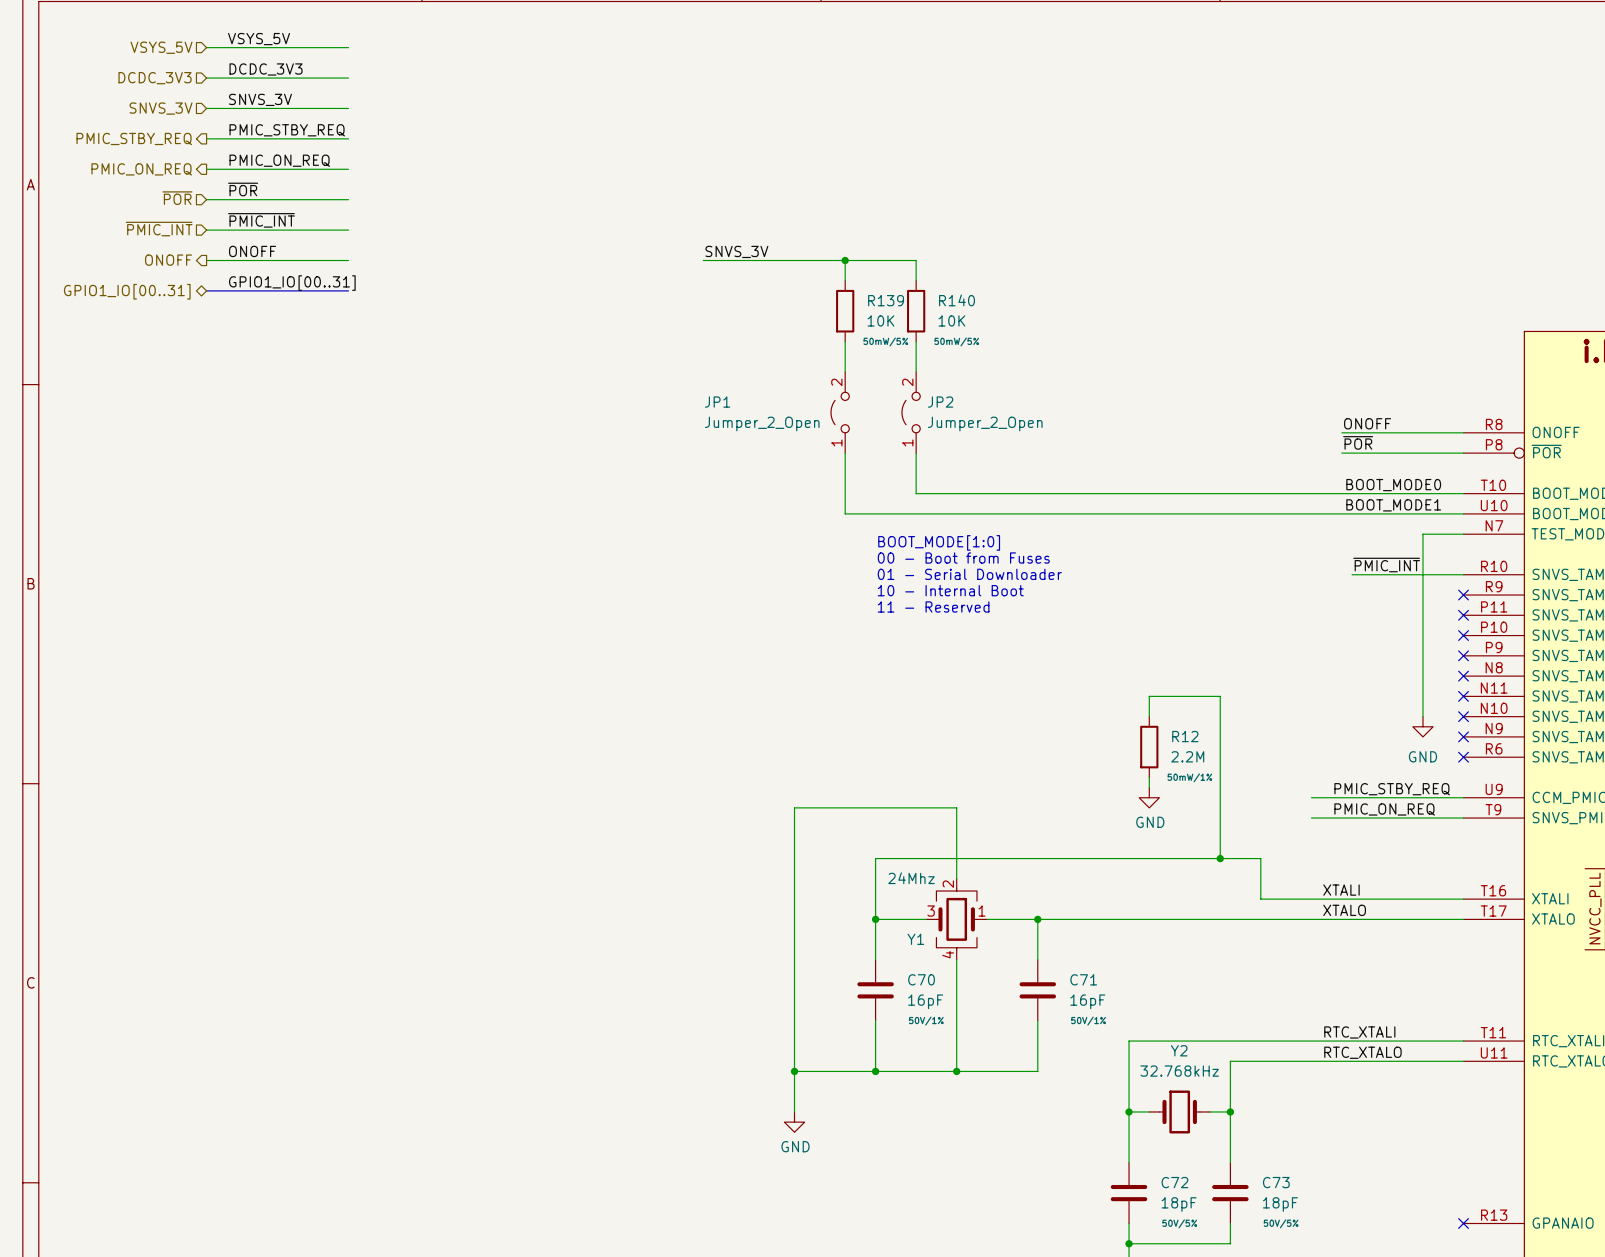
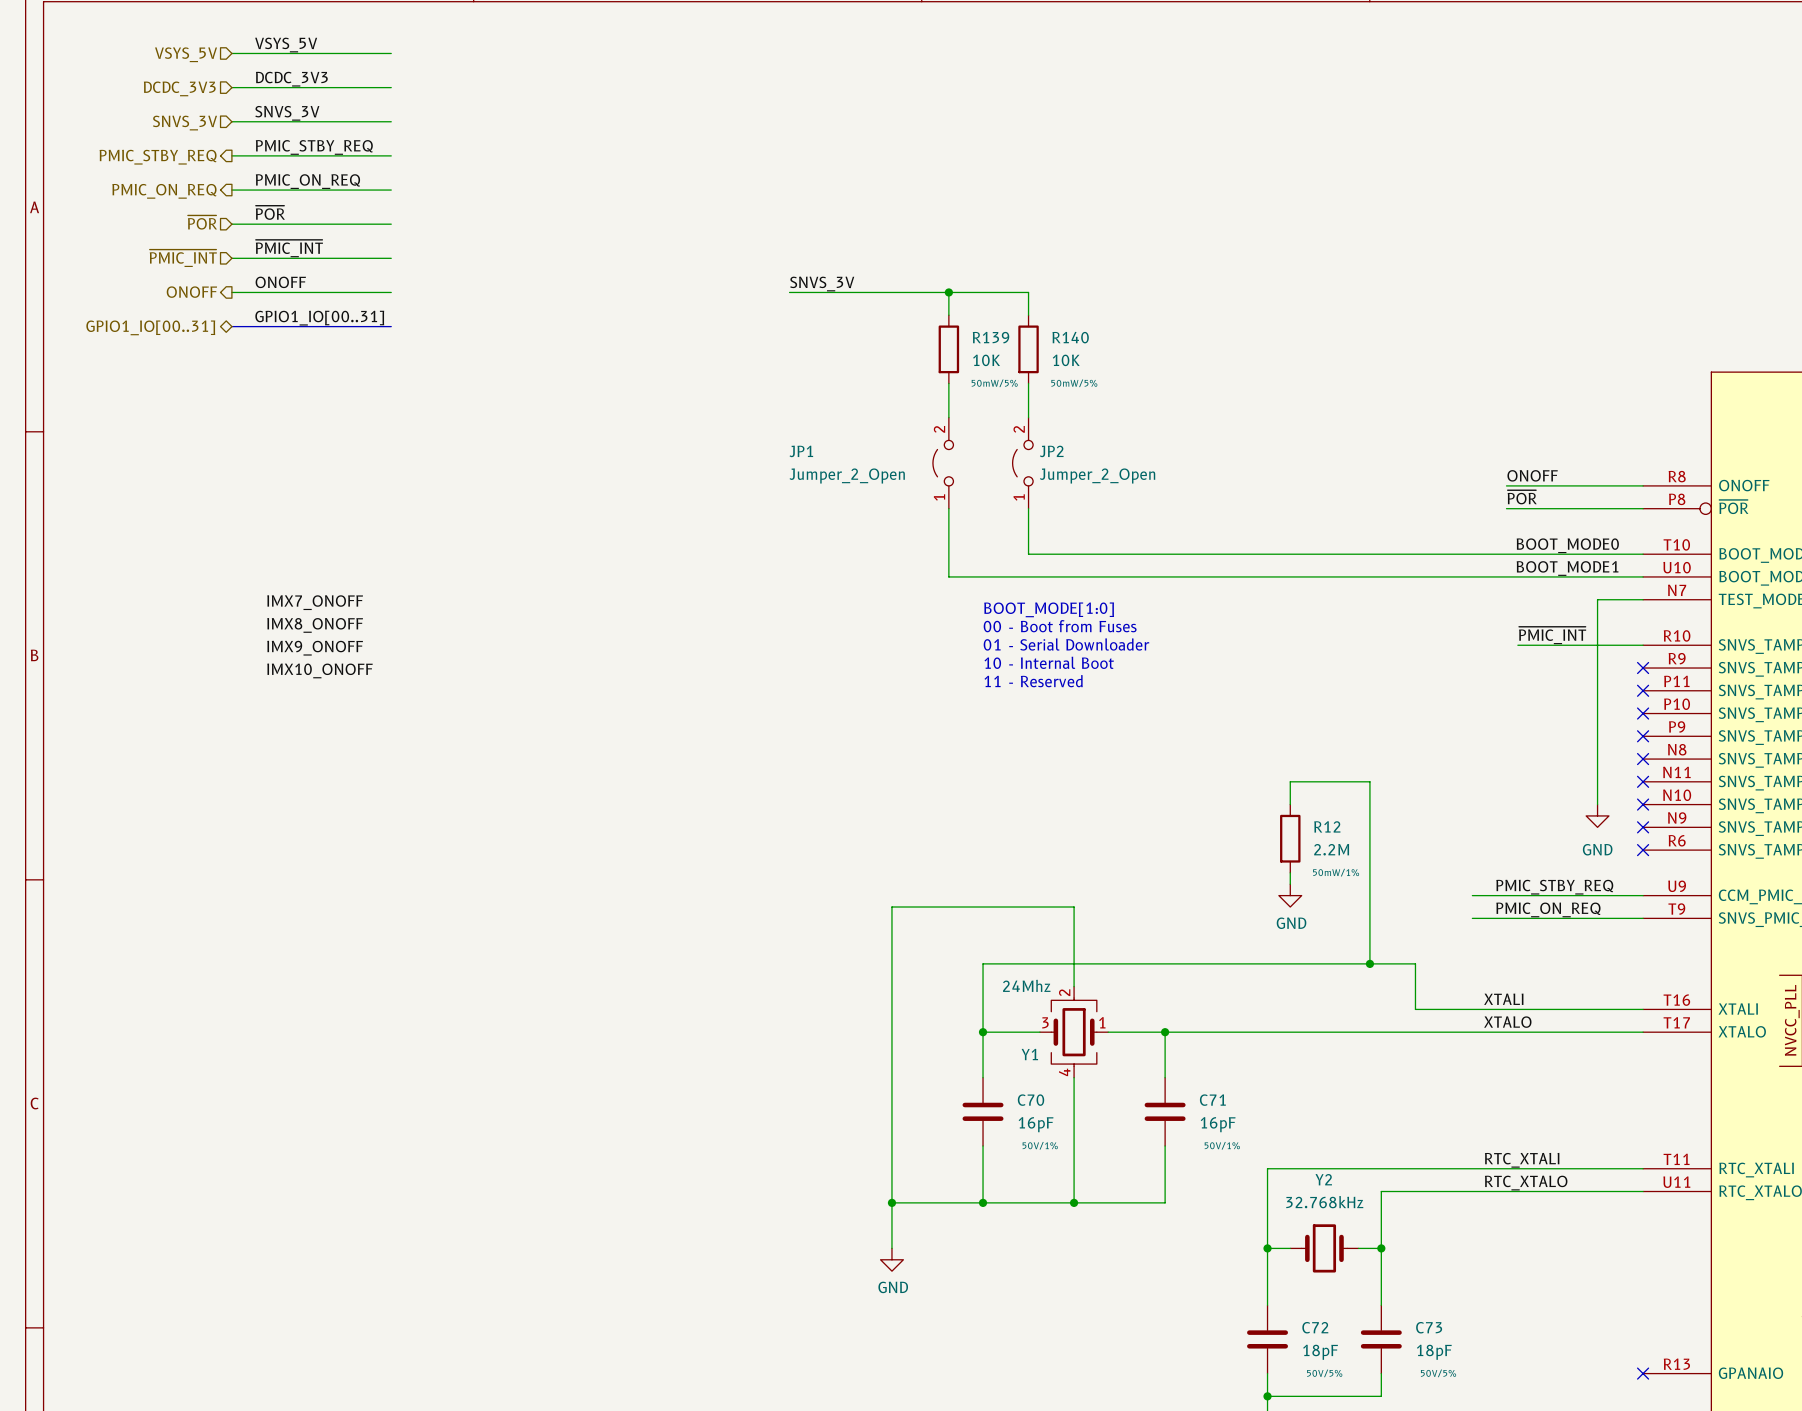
label: none -> IMX7_ONOFF (315, 602)
label: none -> IMX8_ONOFF (315, 625)
label: none -> IMX9_ONOFF (315, 648)
label: none -> IMX10_ONOFF (319, 670)

